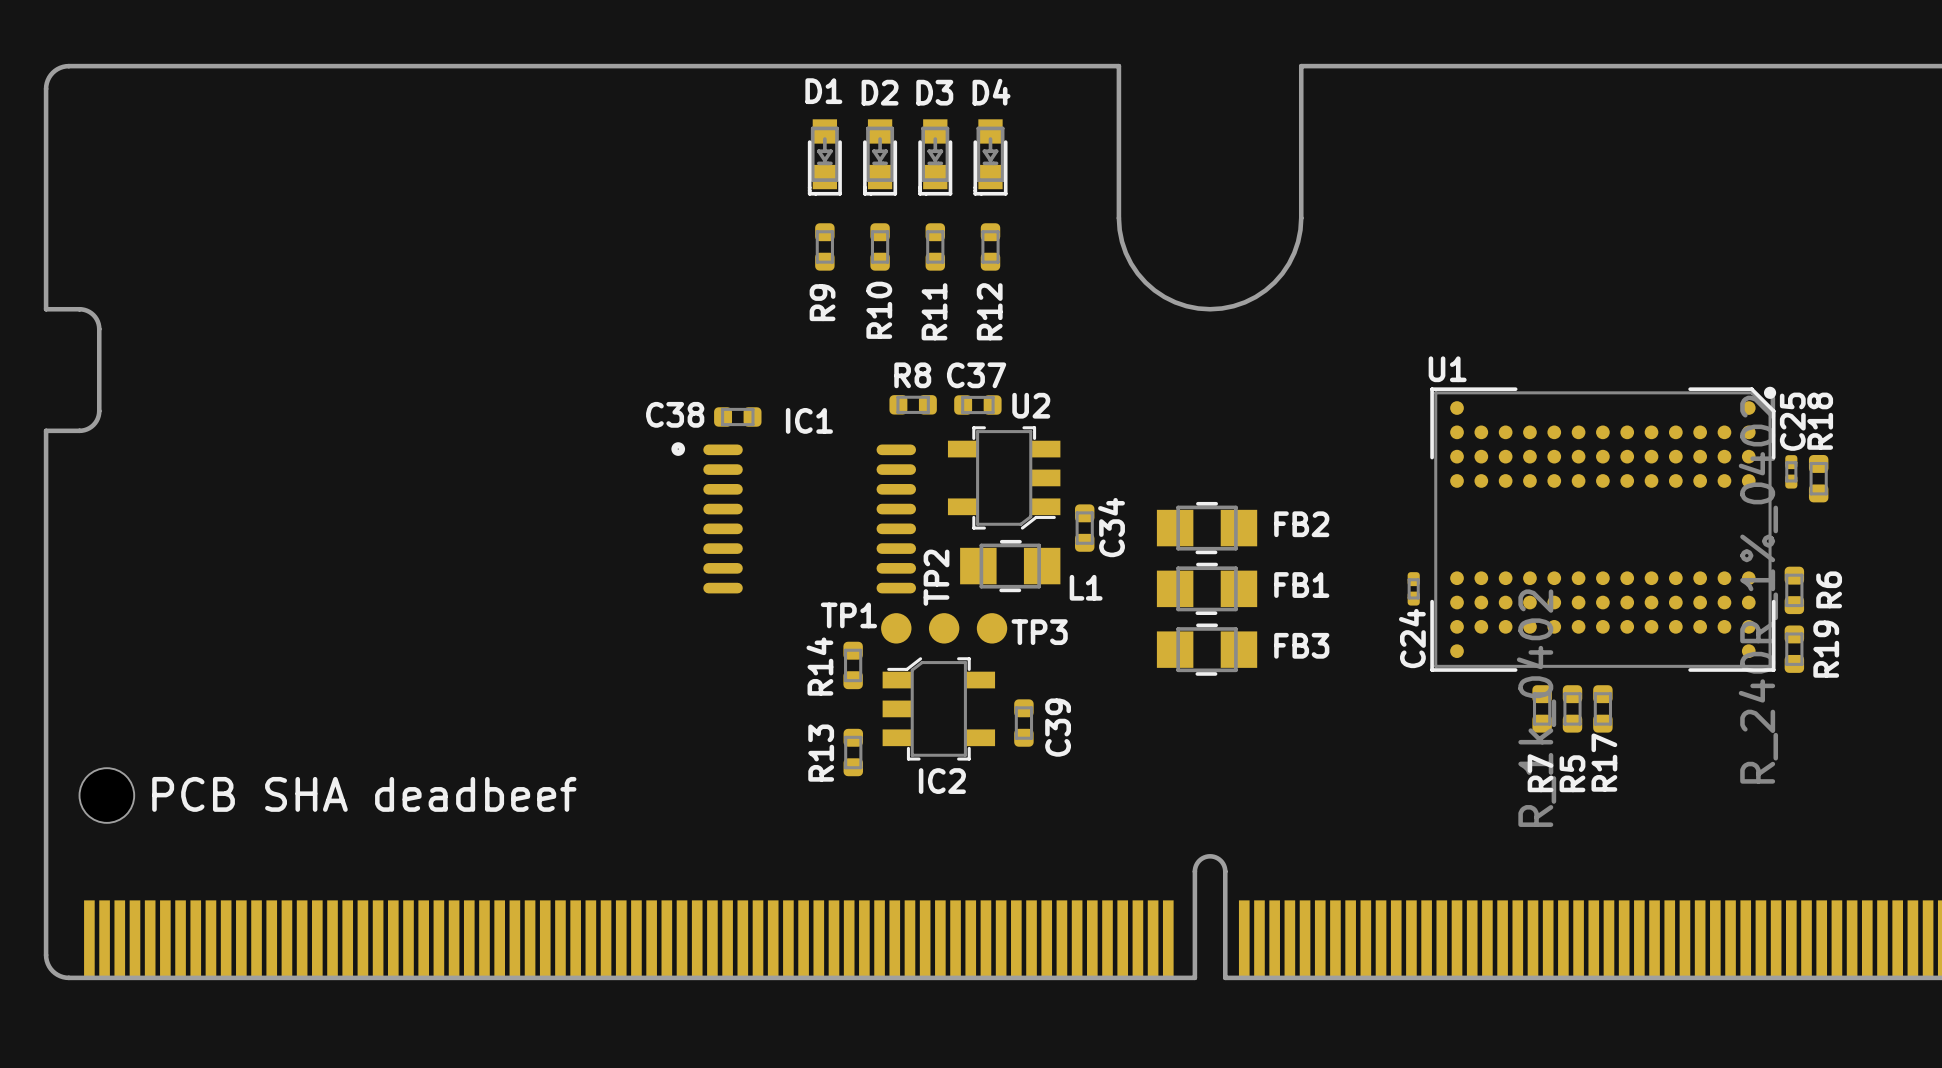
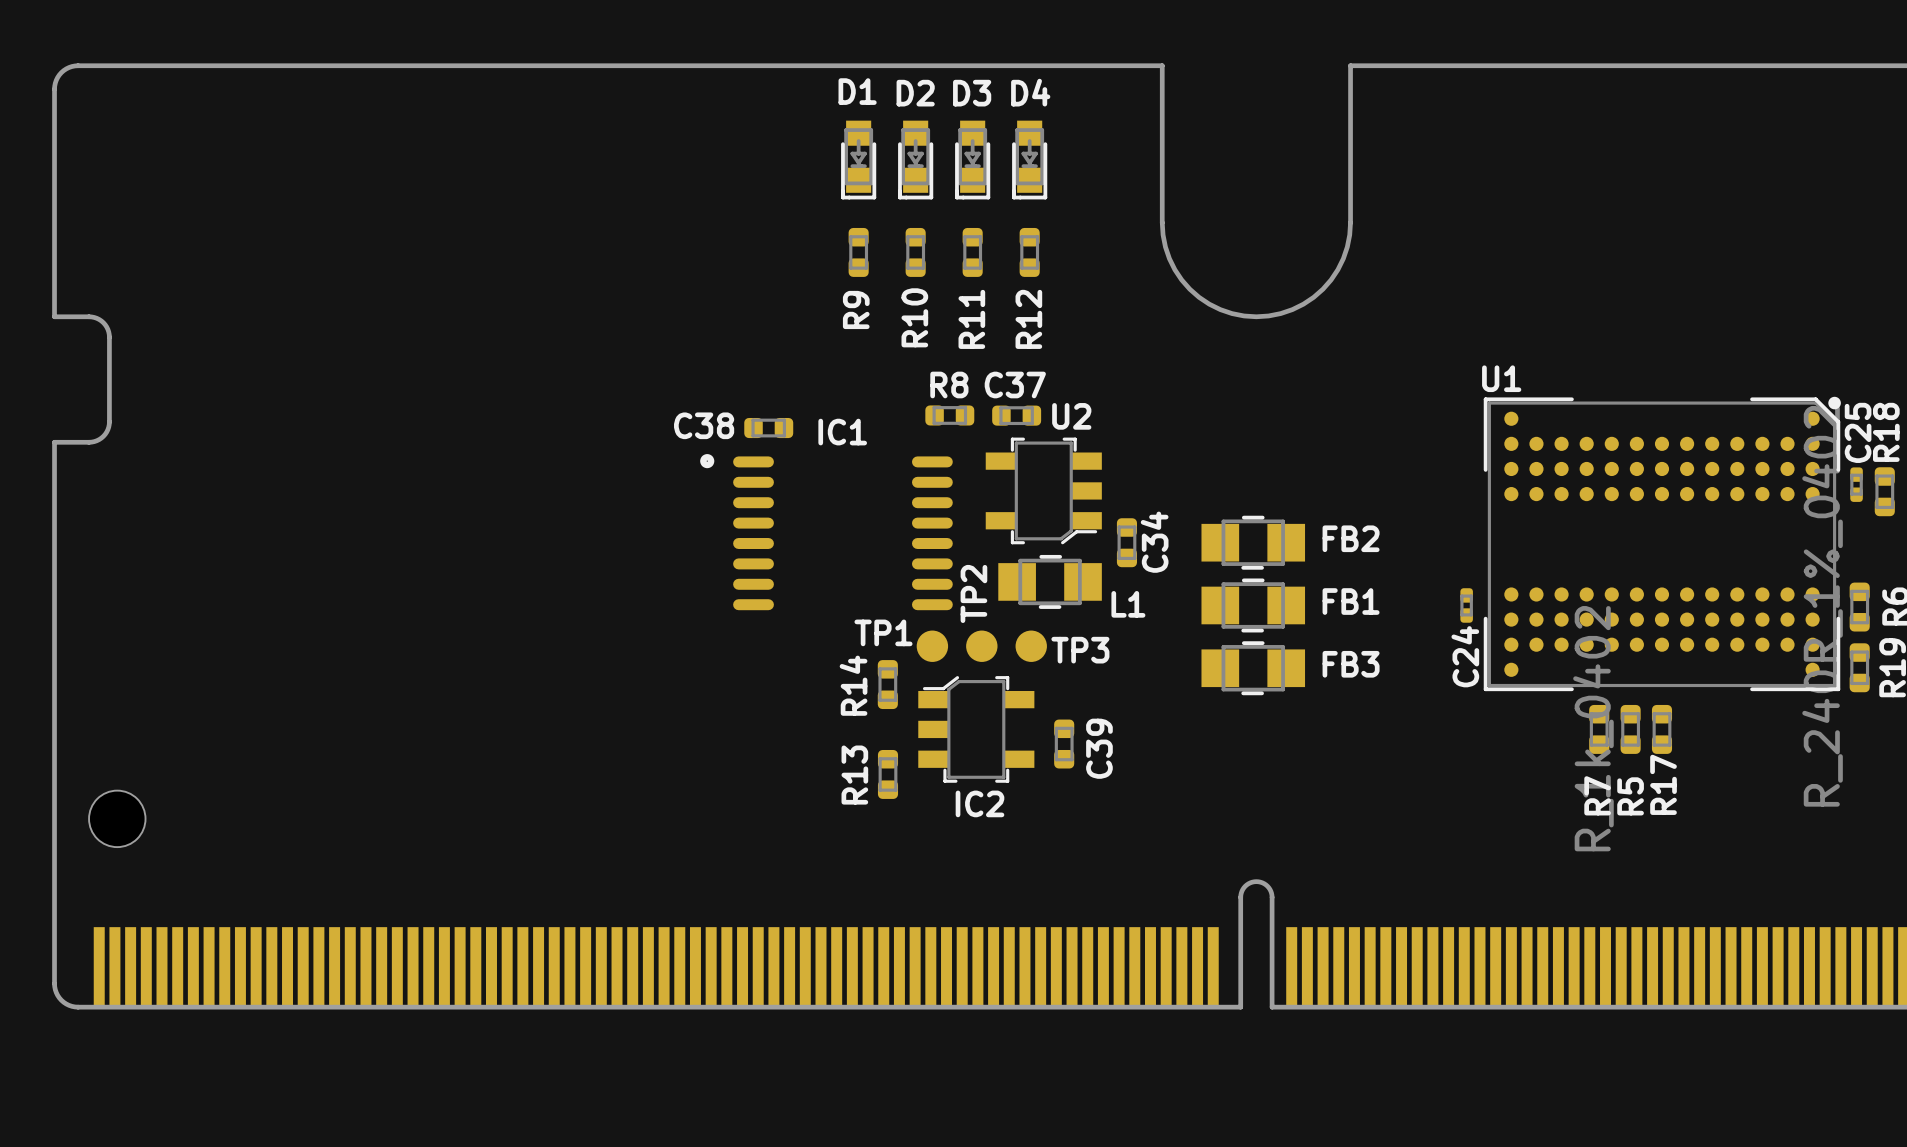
text: PCB SHA deadbeef (364, 794) -> none

